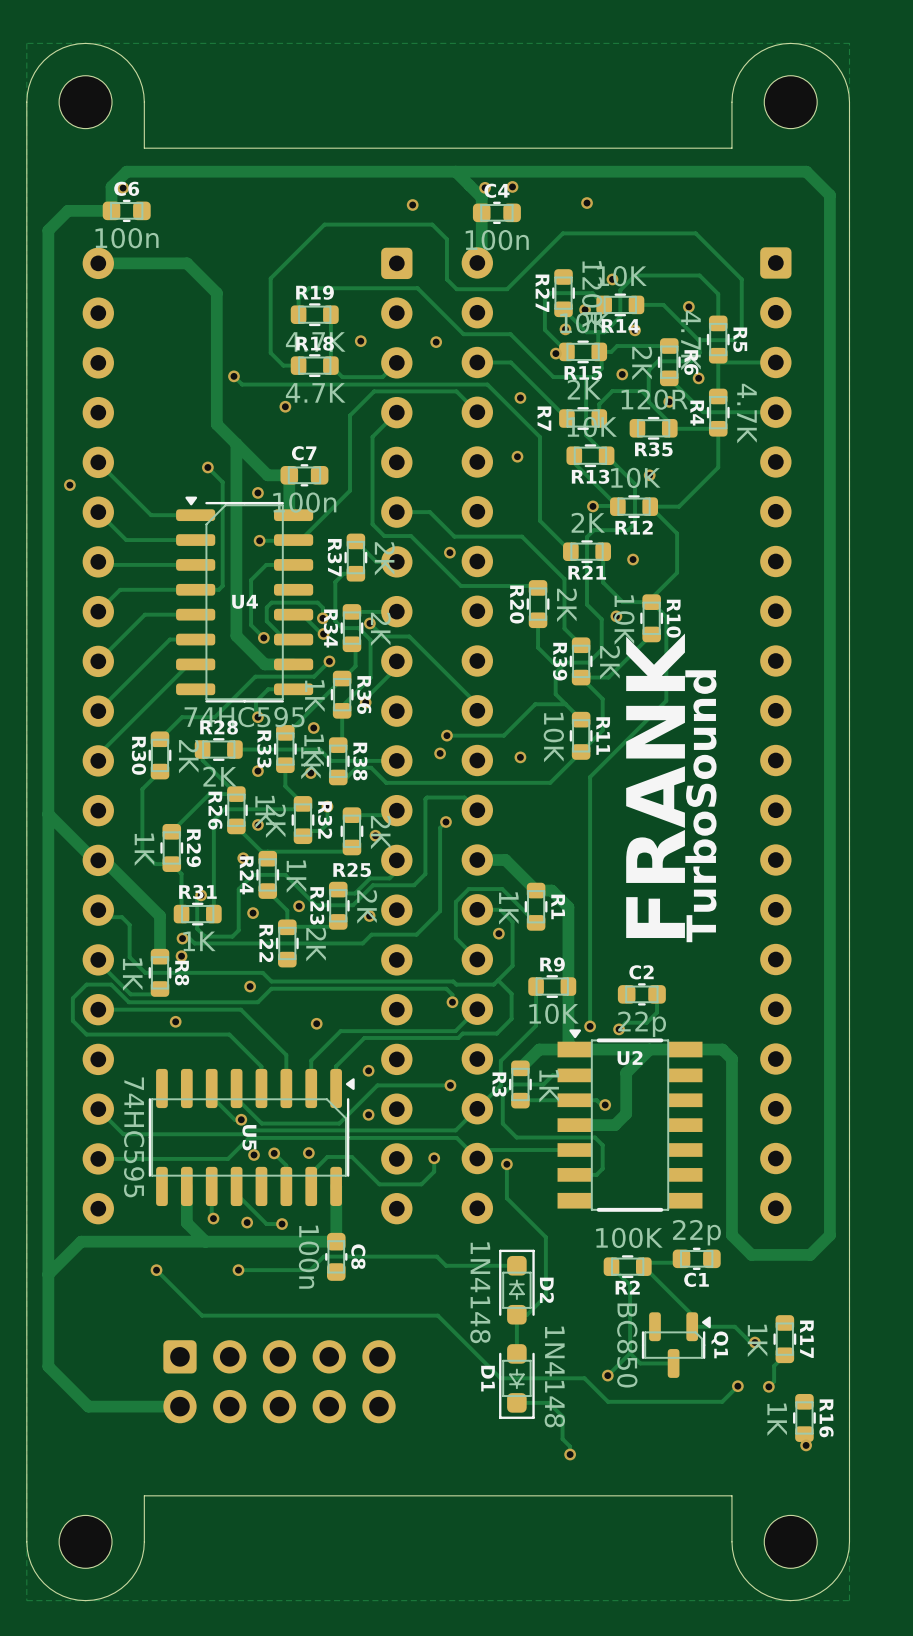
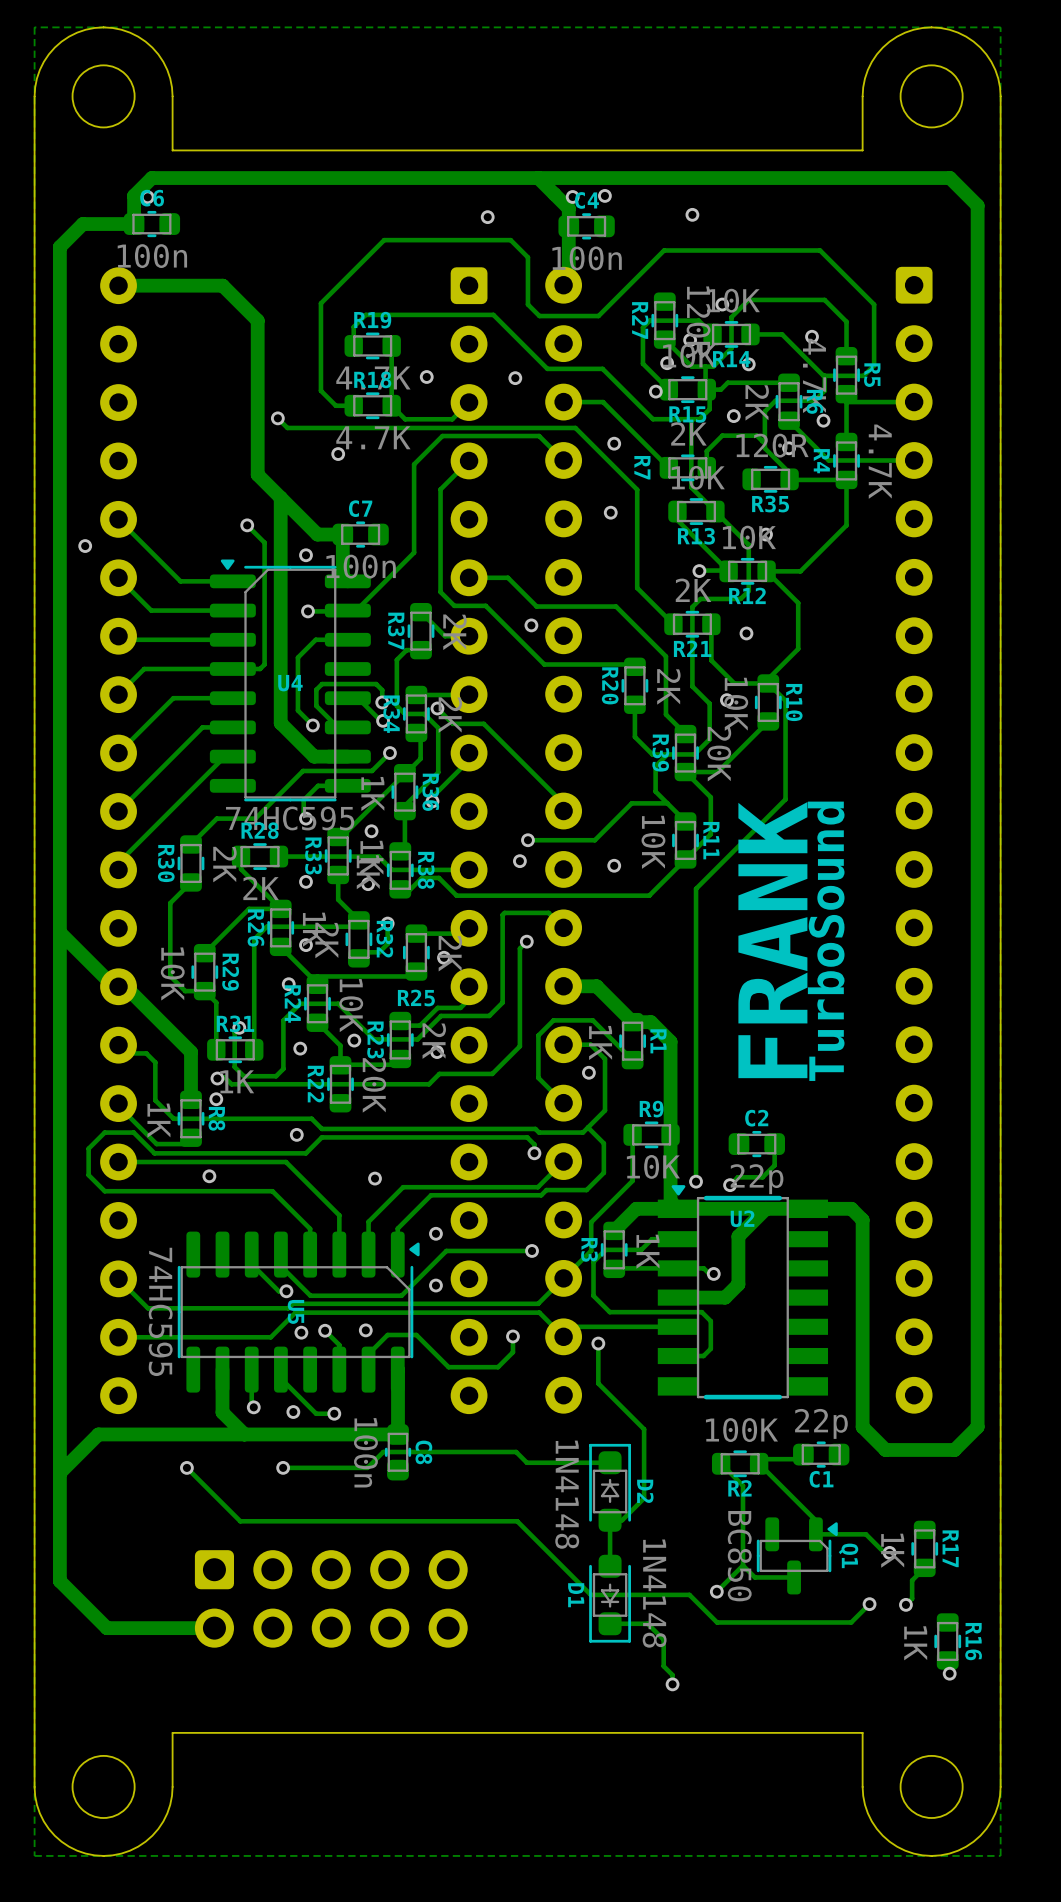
R39 value: 2K (610, 662) -> 20K (719, 754)
R29 value: 1K (144, 849) -> 10K (172, 973)
R24 value: 1K (296, 876) -> 10K (351, 1005)
R22 value: 2K (316, 944) -> 20K (374, 1085)

